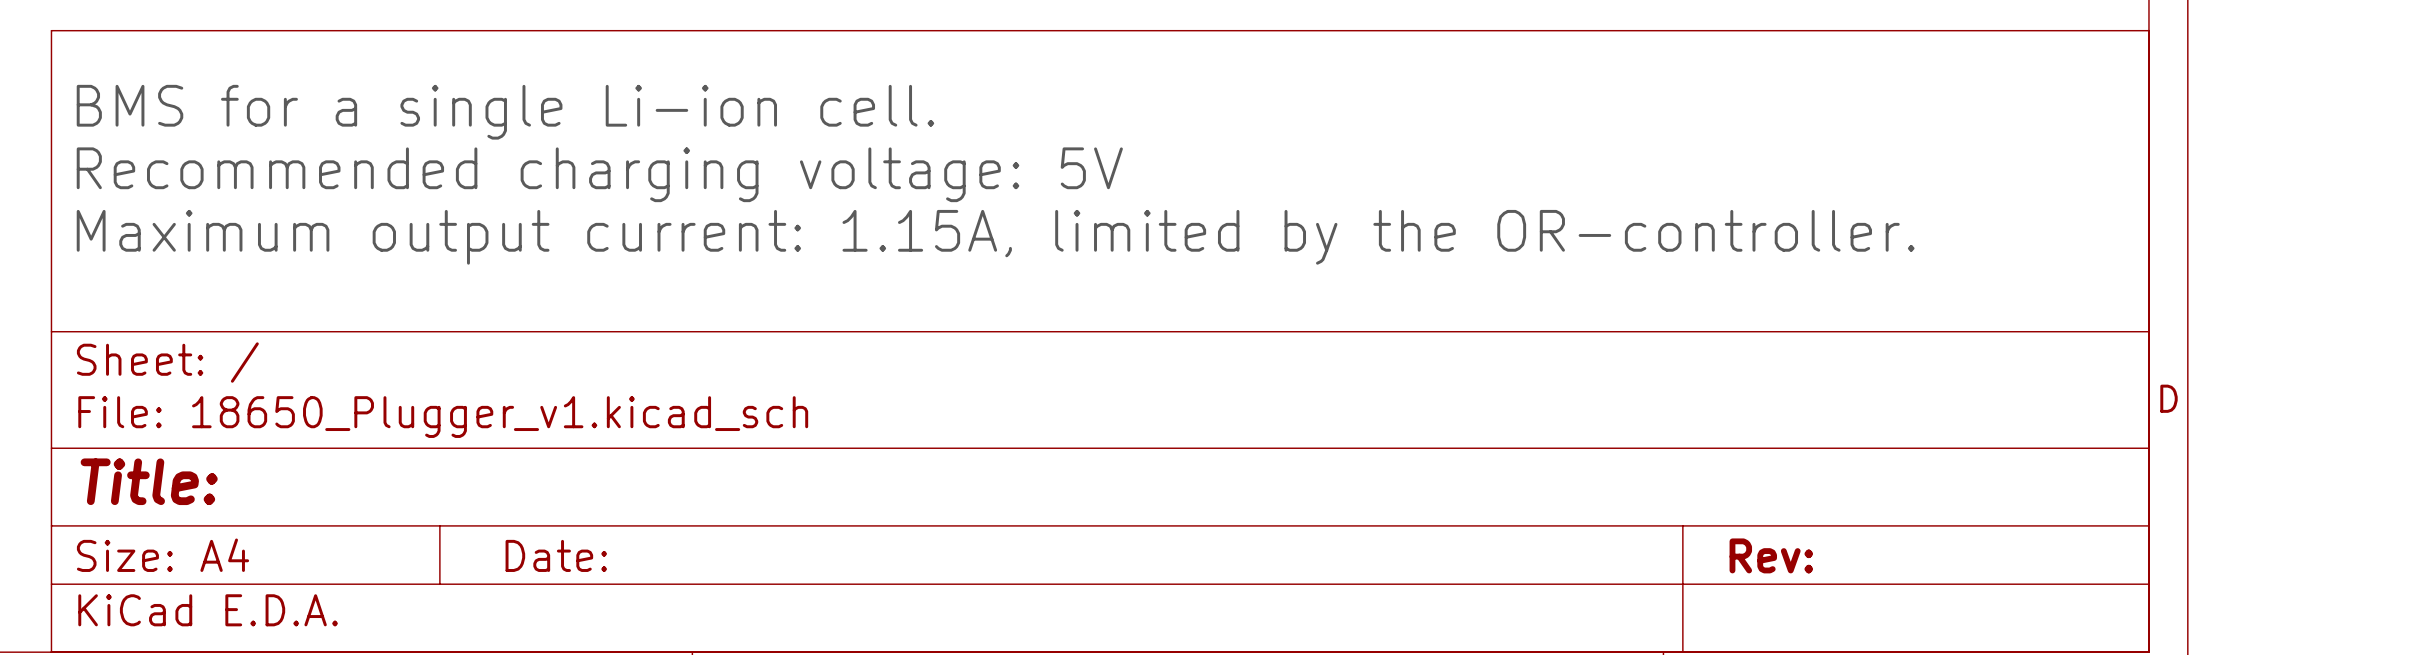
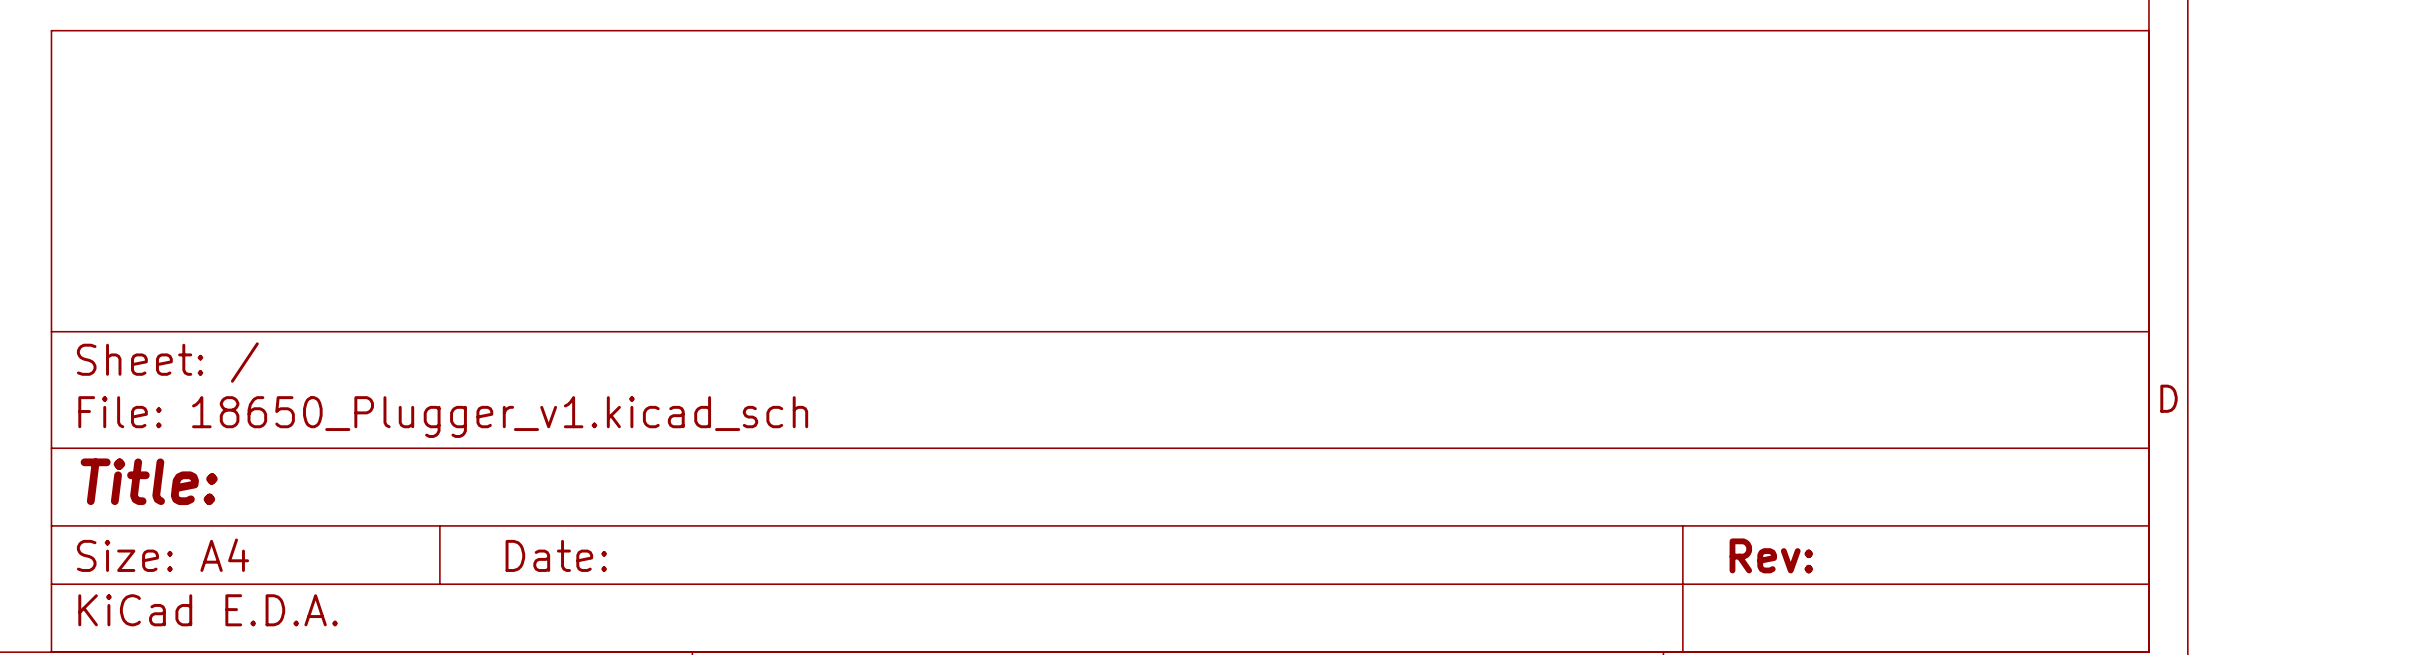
text: BMS for a single Li-ion cell. (505, 112) -> none
text: Recommended charging voltage: 5V (599, 174) -> none
text: Maximum output current: 1.15A, limited by the OR-controller. (995, 237) -> none

